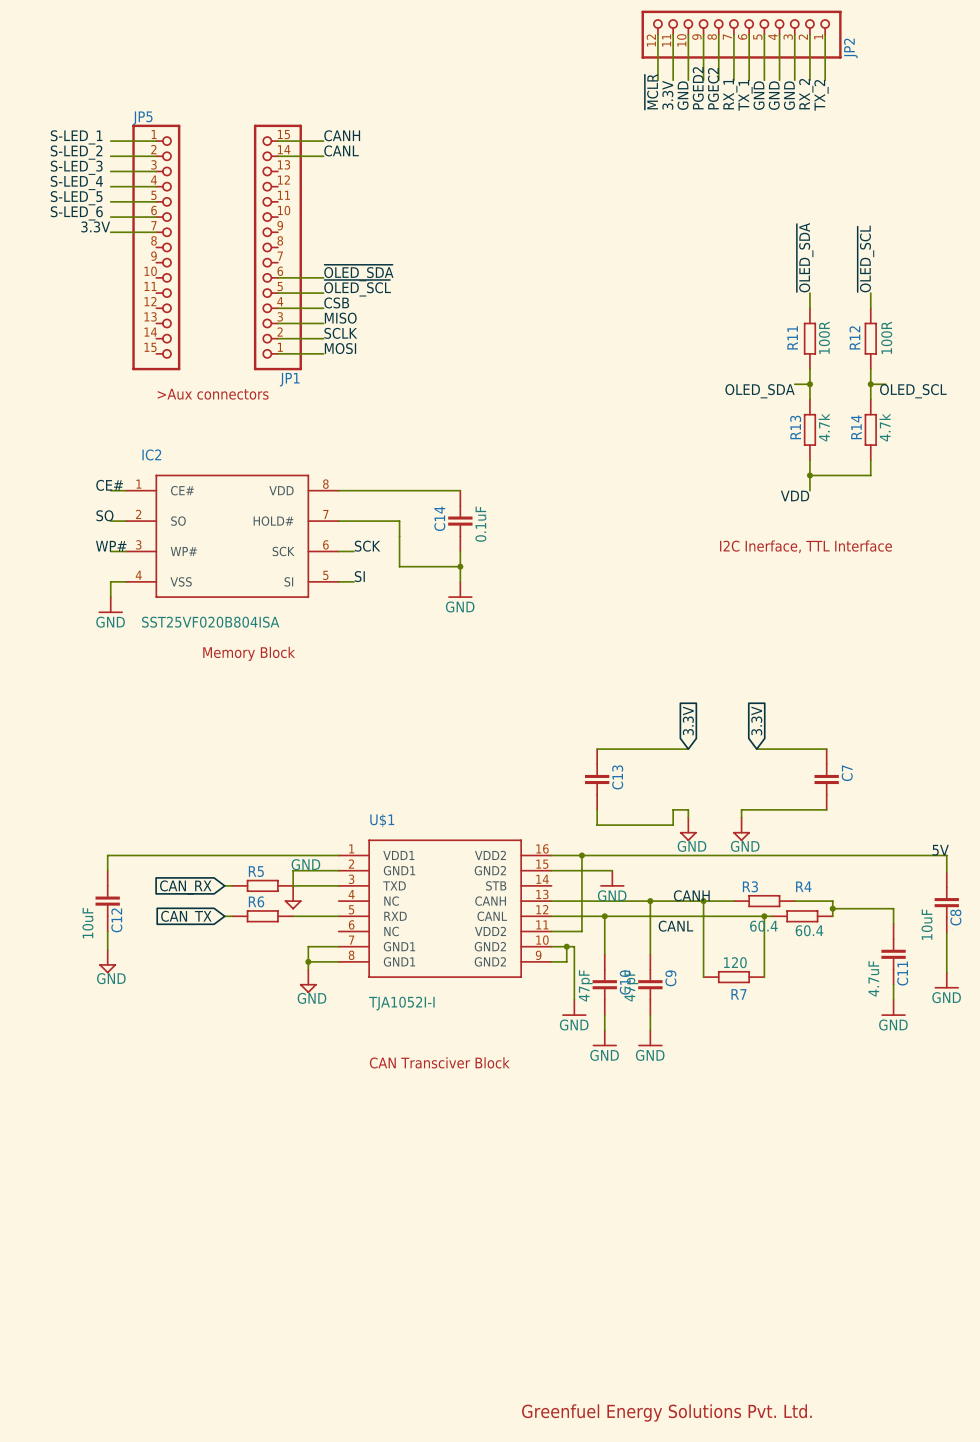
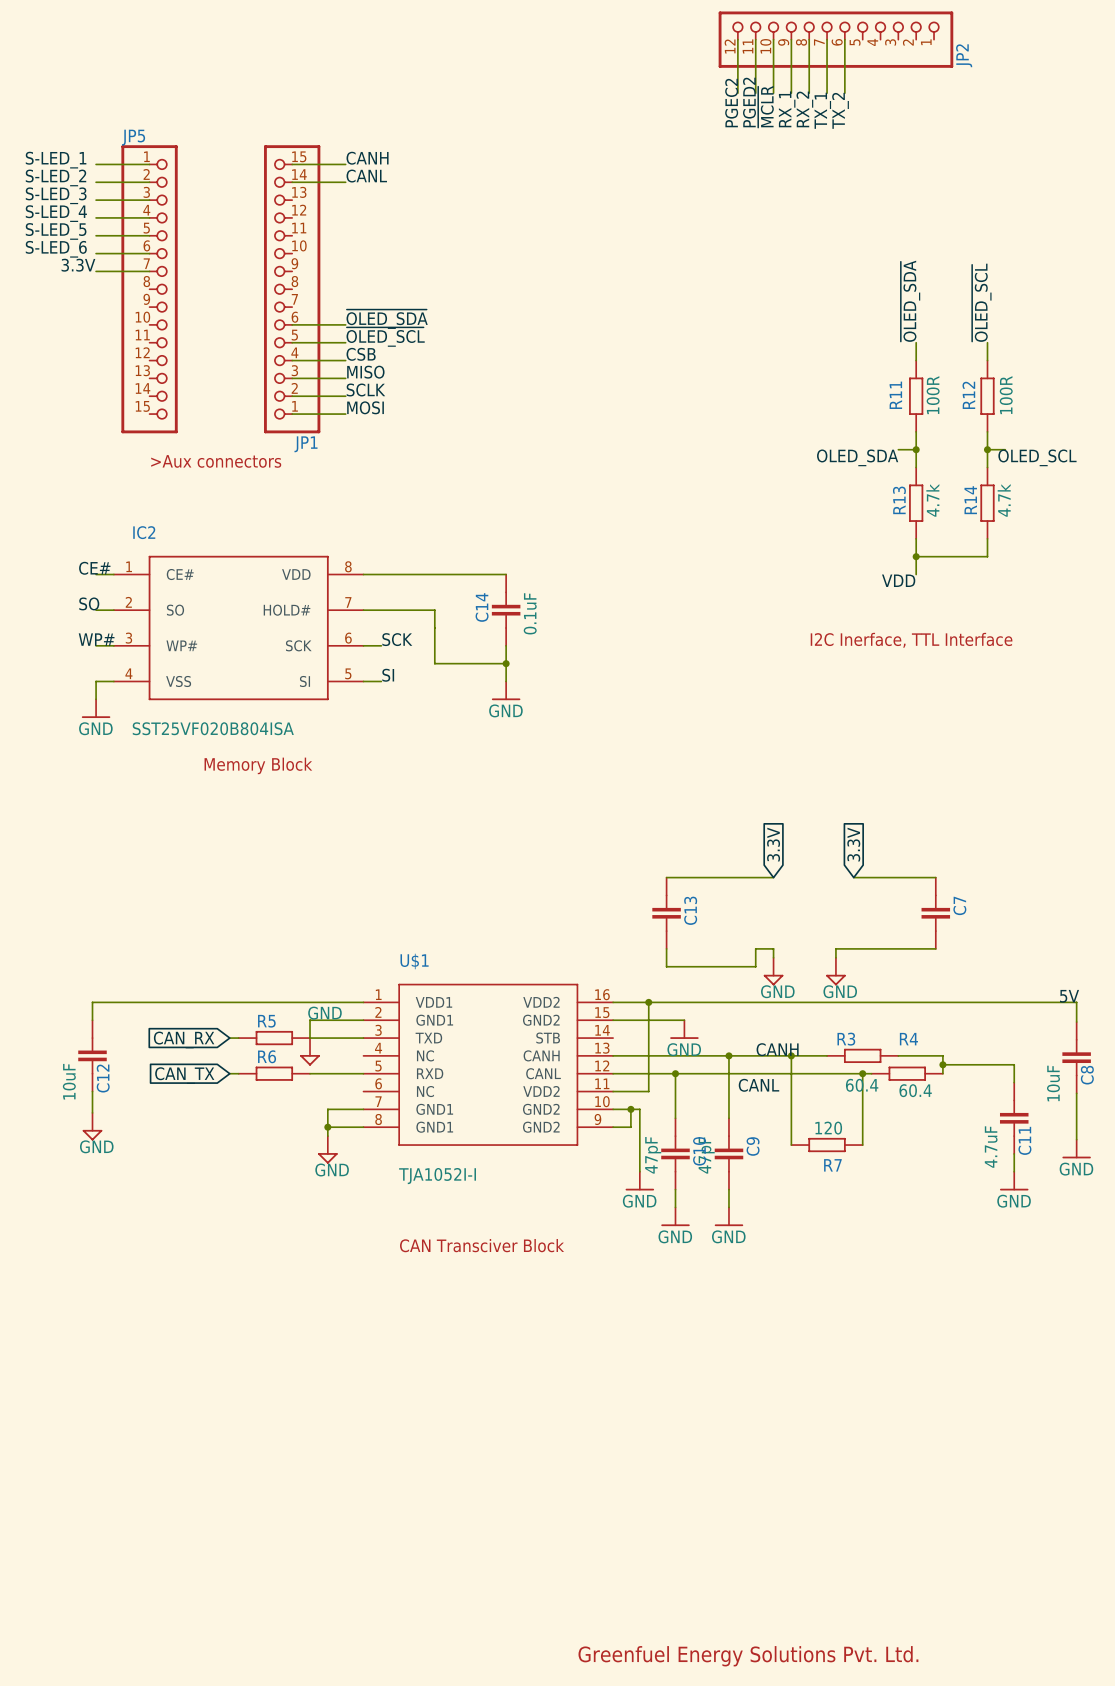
wire: (764, 34) (764, 80) -> none
wire: (779, 34) (779, 80) -> none
wire: (794, 34) (794, 80) -> none
wire: (809, 34) (809, 80) -> none
wire: (825, 34) (825, 80) -> none
label: PGED2 (698, 88) -> RX_1 (787, 109)
label: PGEC2 (713, 88) -> RX_2 (804, 109)
label: ~{MCLR} (651, 91) -> PGEC2 (731, 103)
label: RX_1 (730, 94) -> TX_1 (822, 110)
label: RX_2 (806, 94) -> none
label: 3.3V (667, 95) -> PGED2 (749, 102)
label: GND (683, 95) -> ~{MCLR} (766, 106)
label: TX_1 (745, 95) -> TX_2 (840, 110)
label: GND (759, 95) -> none
label: GND (774, 95) -> none
label: GND (789, 95) -> none
label: TX_2 (821, 95) -> none

